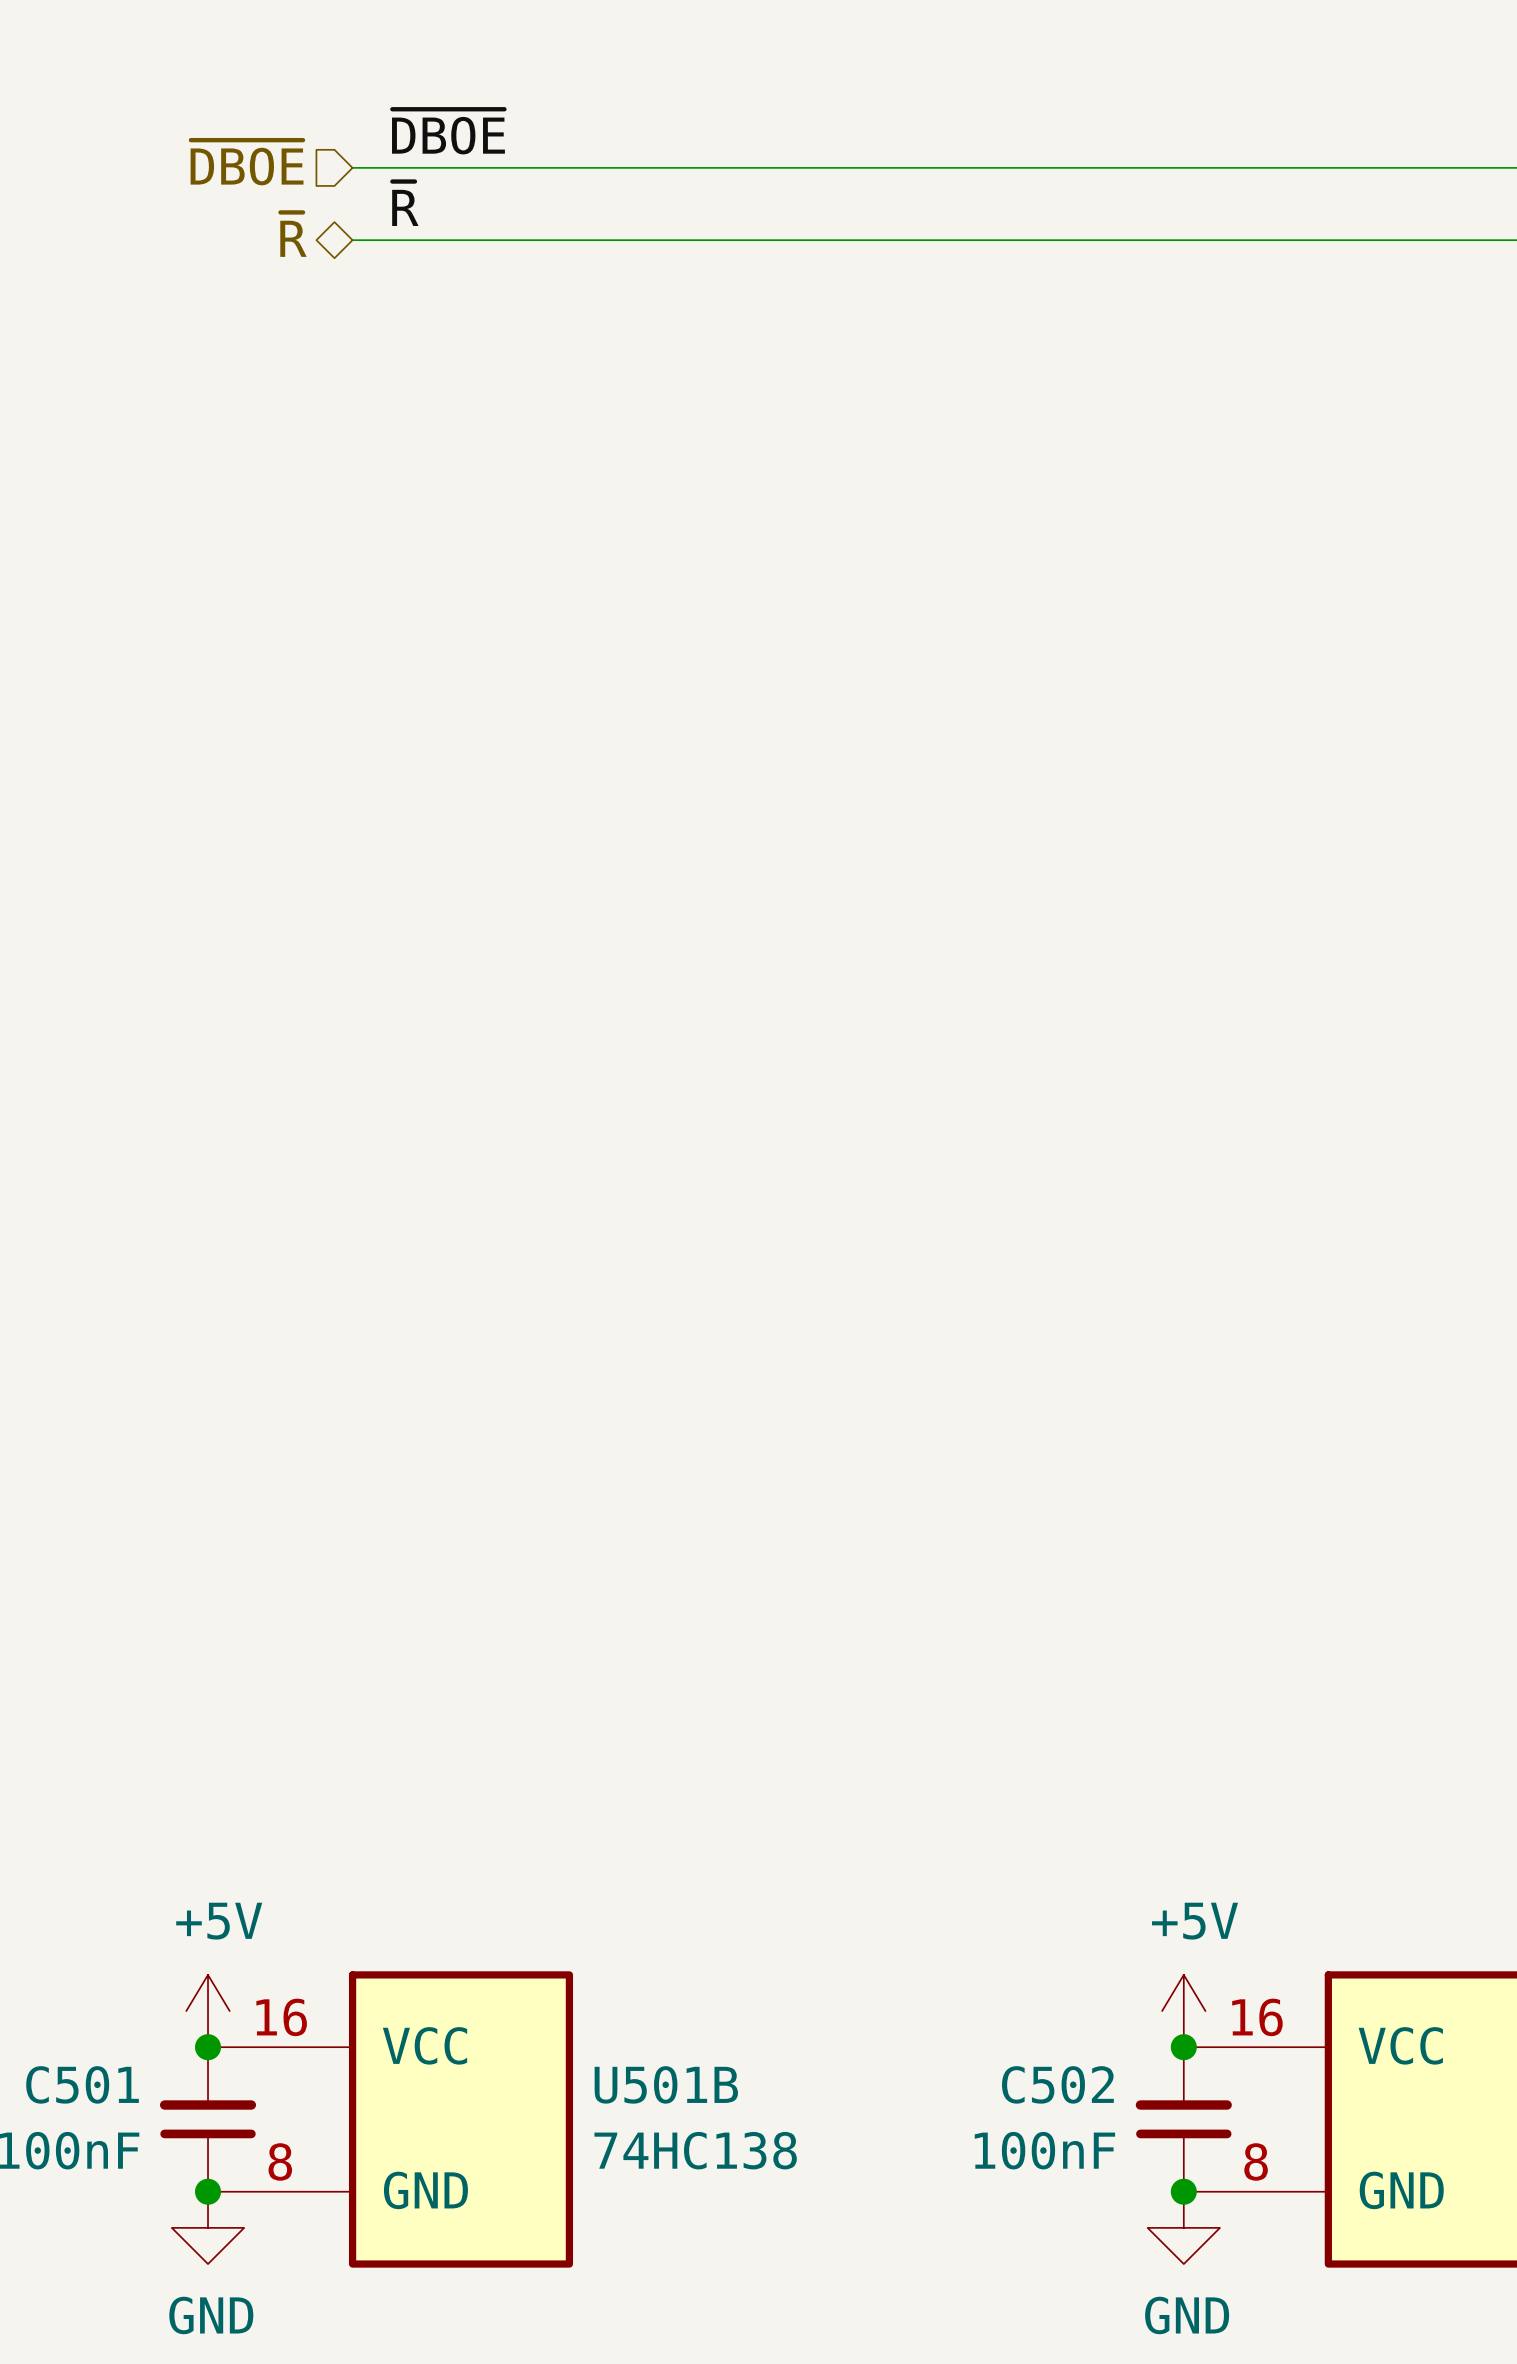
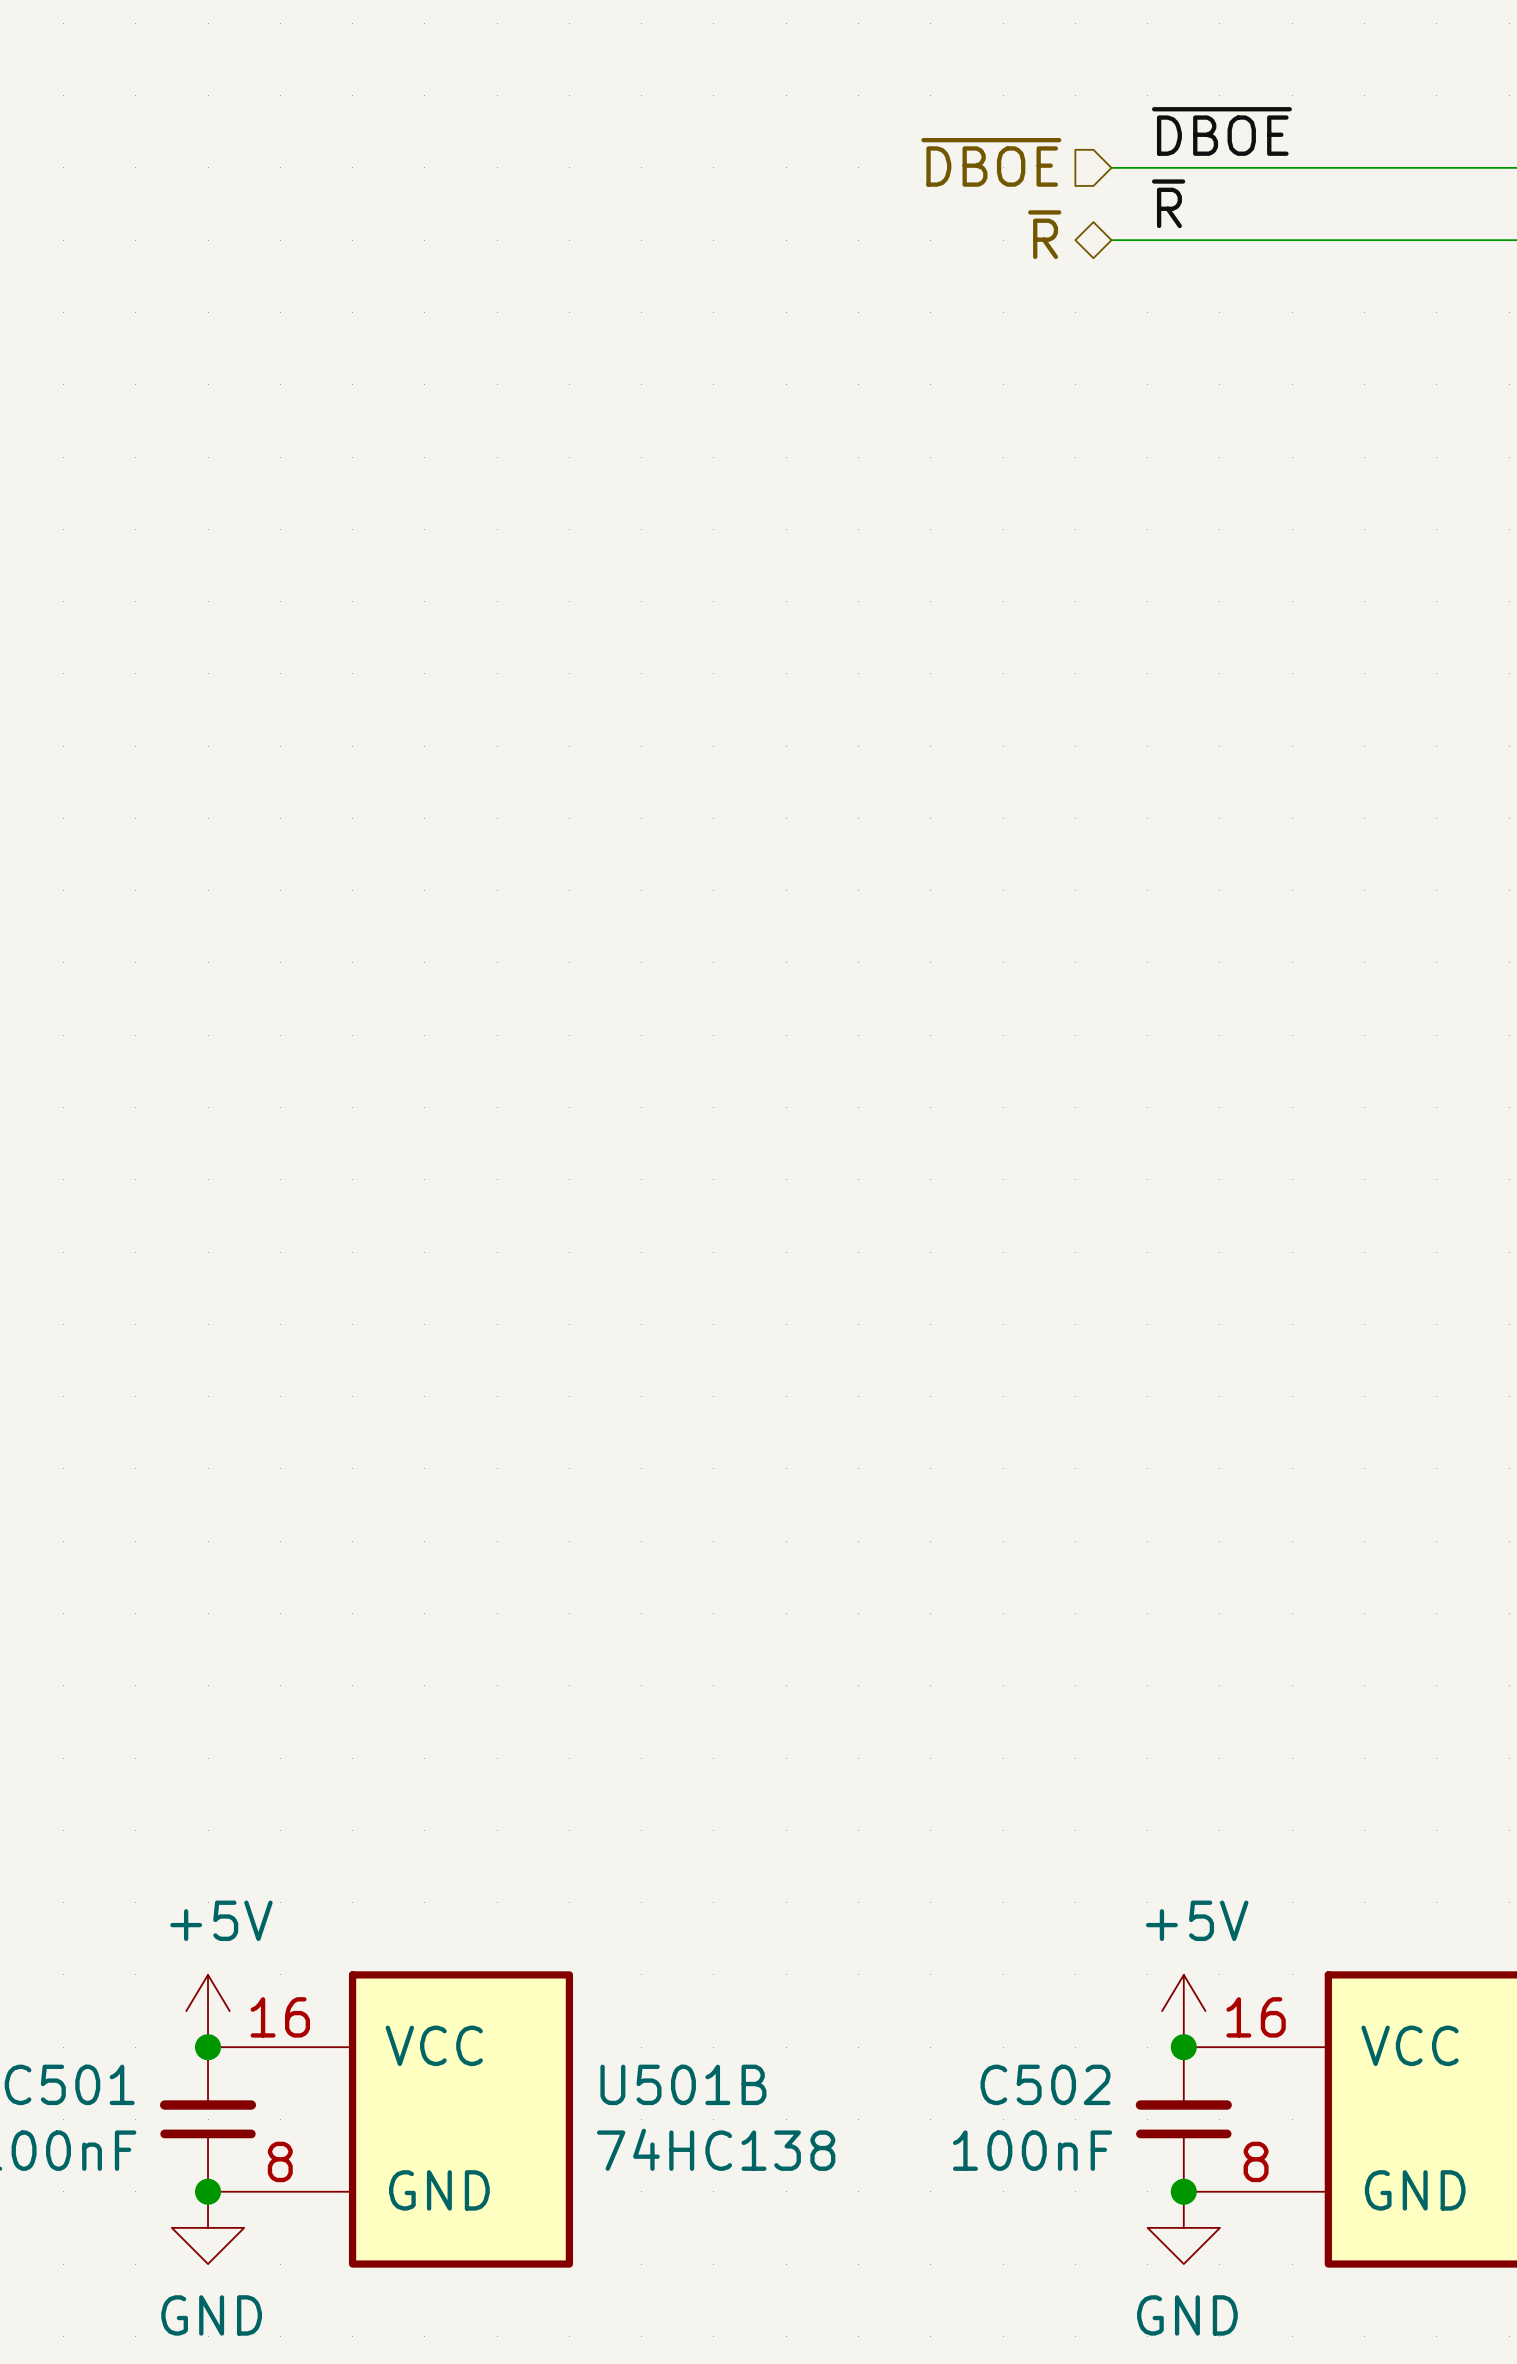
label: ~{DBOE} (448, 131) -> none
label: none -> ~{DBOE} (1221, 131)
hierarchical label: ~{DBOE} (247, 162) -> none
hierarchical label: none -> ~{DBOE} (991, 162)
wire: (352, 167) (1111, 167) -> none
label: ~{R} (405, 203) -> none
label: none -> ~{R} (1168, 203)
hierarchical label: ~{R} (293, 234) -> none
hierarchical label: none -> ~{R} (1044, 234)
wire: (352, 240) (1111, 240) -> none

